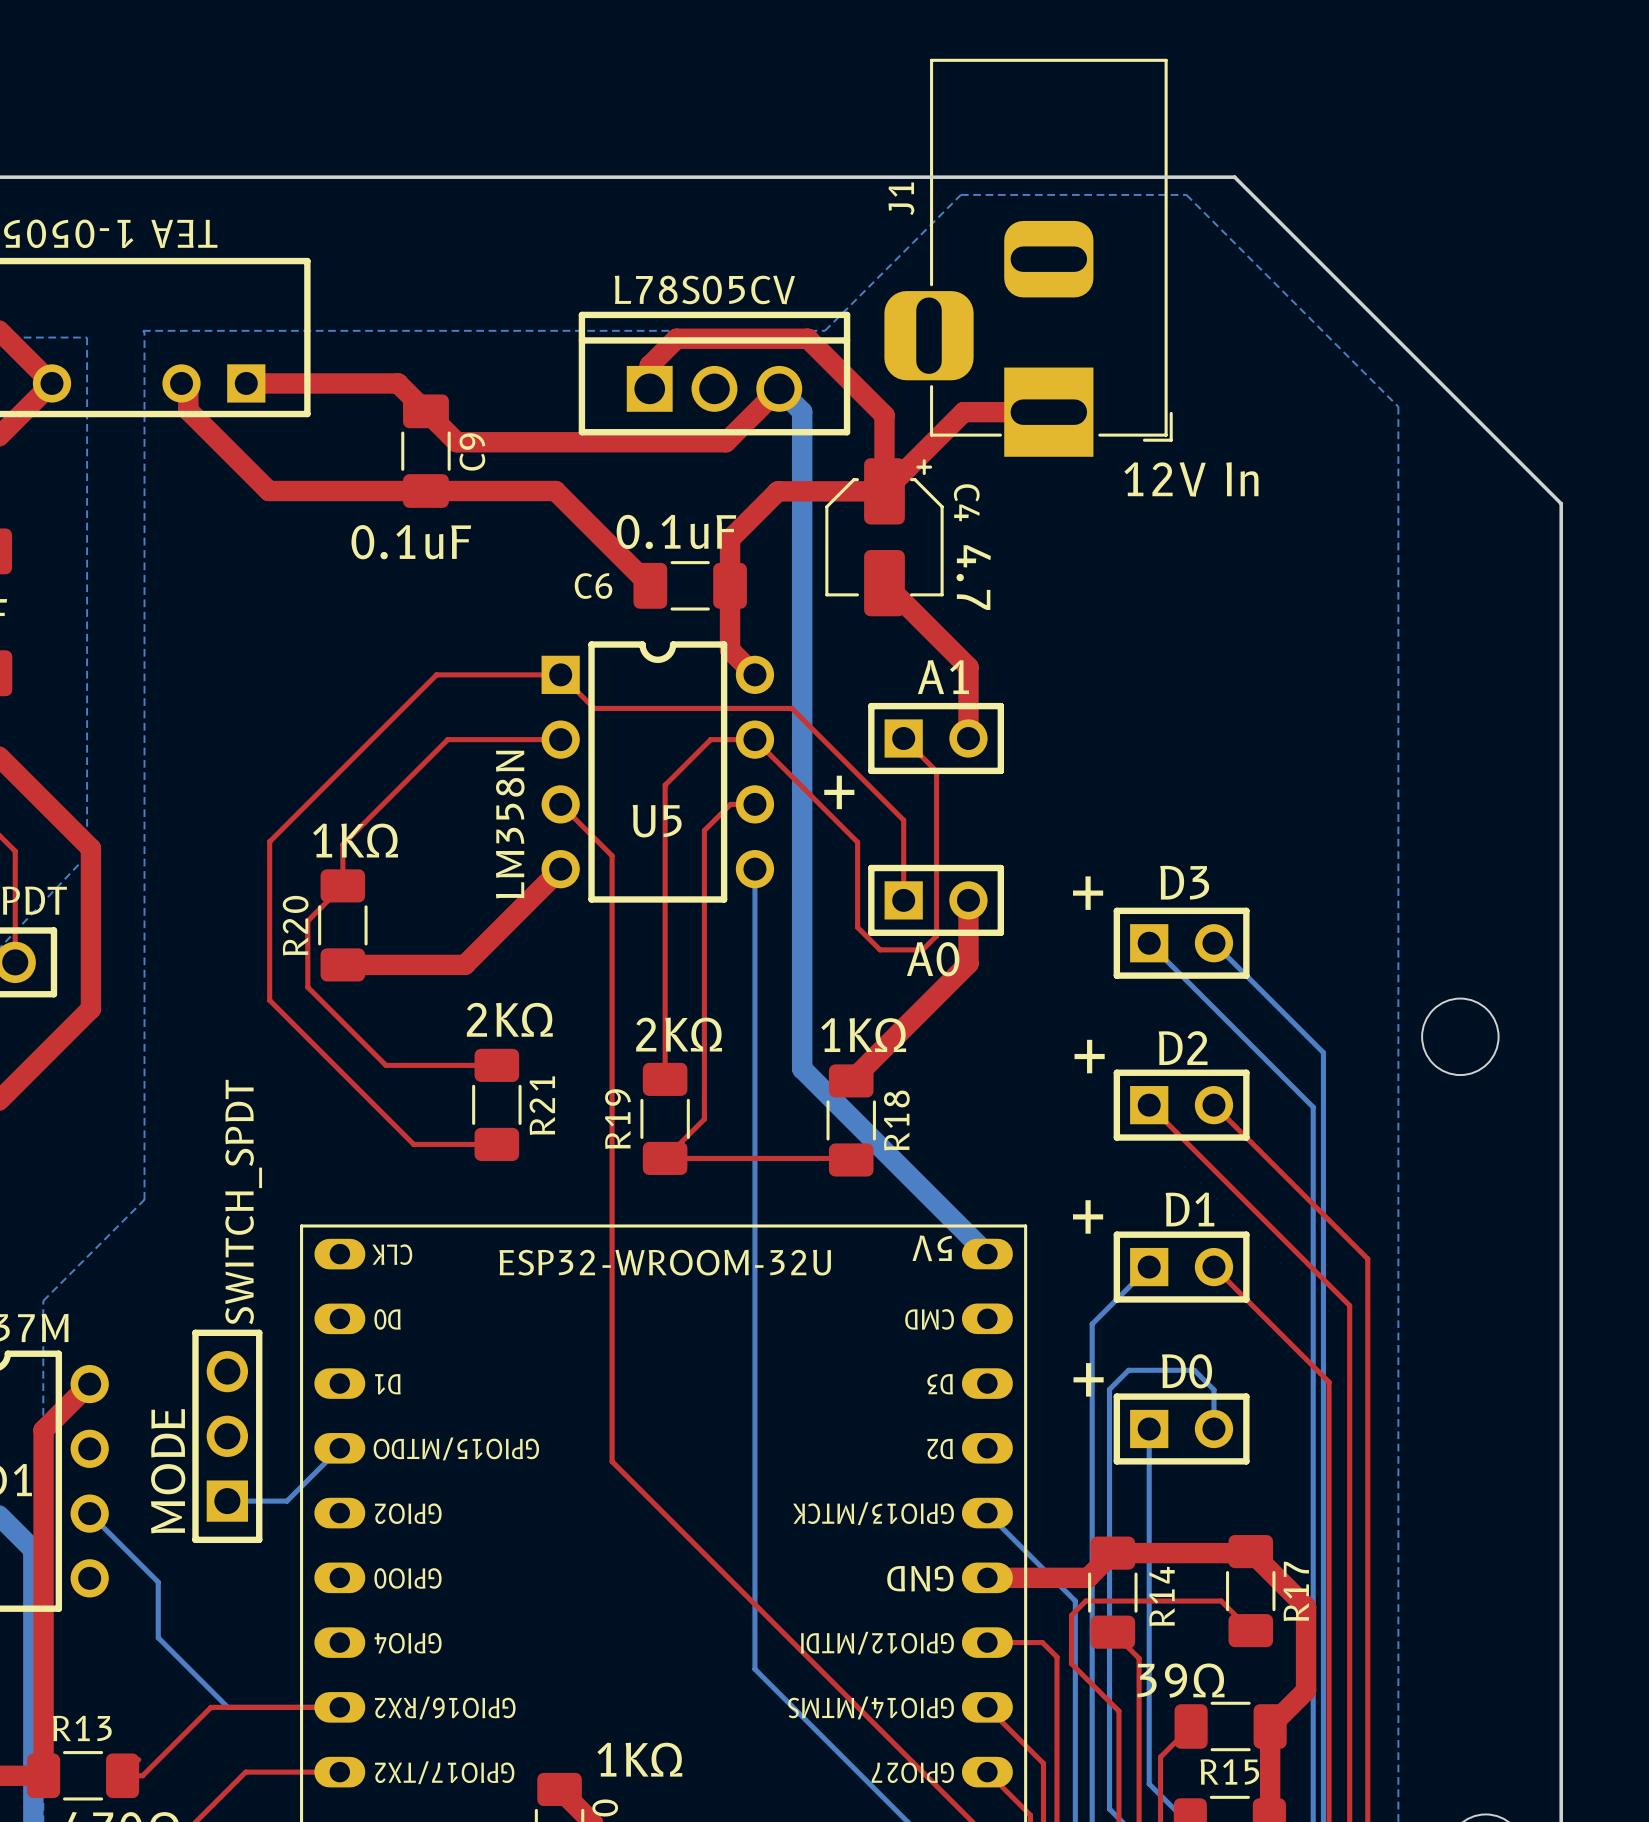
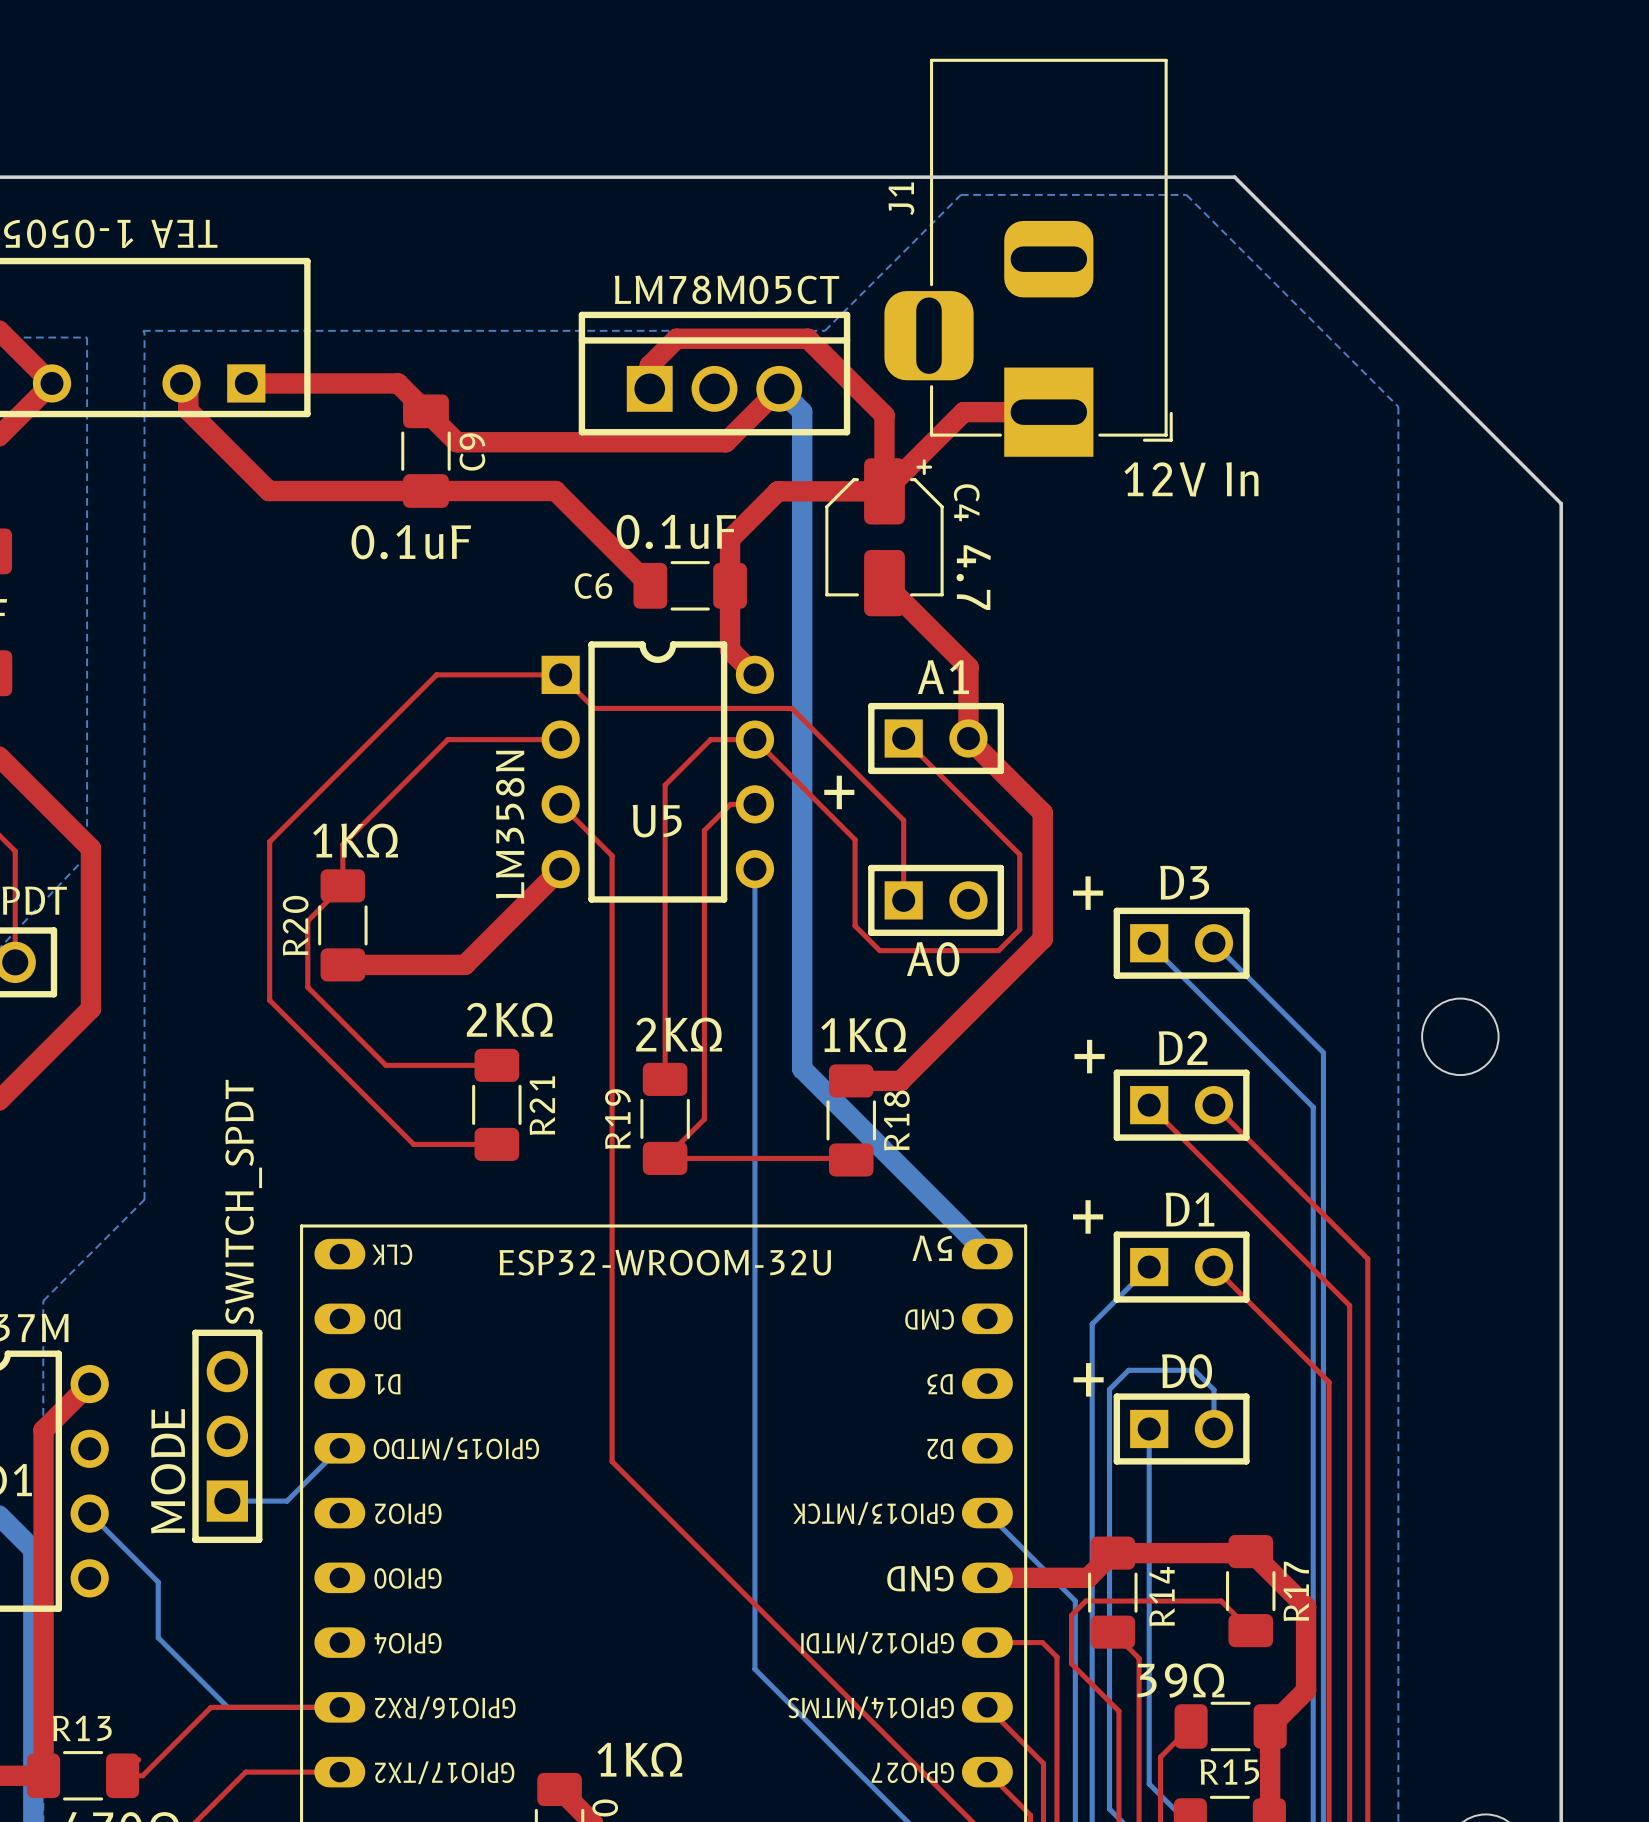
part text: L78S05CV (704, 289) -> LM78M05CT (727, 289)
top track: (936, 771) (936, 935) (922, 949) (880, 949) (857, 927) (857, 842) (855, 839) -> (936, 771) (1019, 854) (1019, 929) (998, 950) (879, 950) (855, 925) (855, 839)
top track: (968, 900) (968, 963) (851, 1080) -> (968, 738) (1042, 812) (1042, 938) (900, 1080) (851, 1080)

